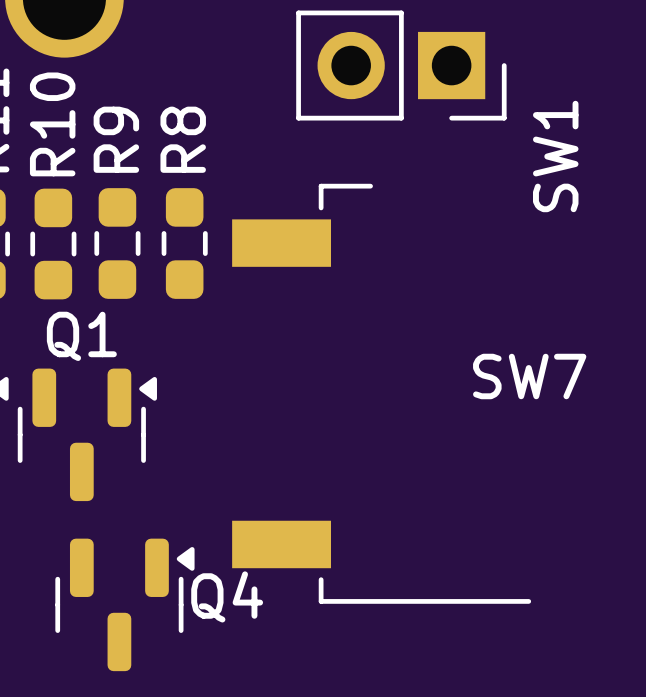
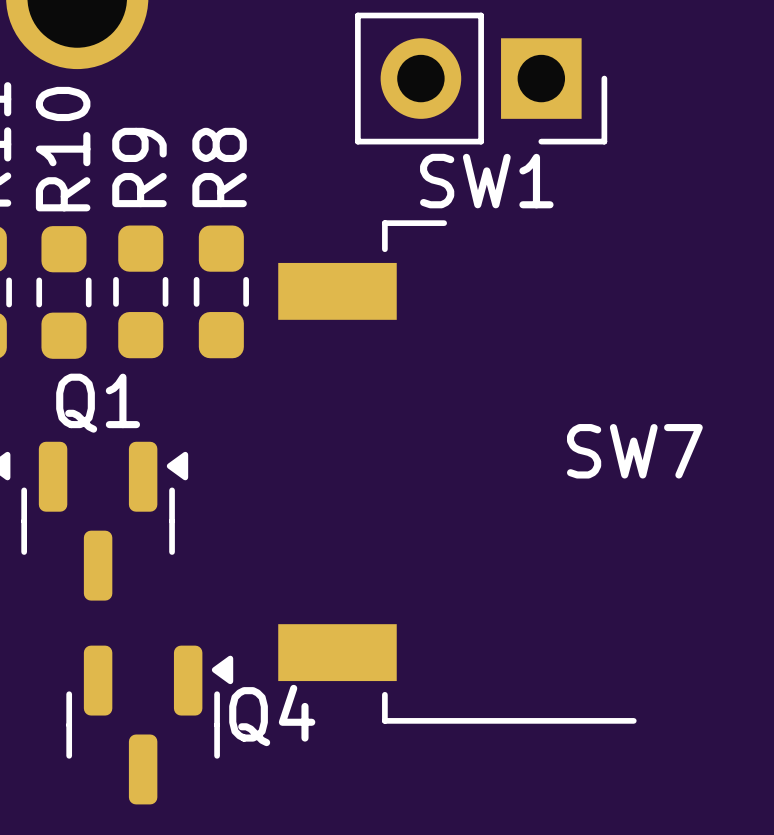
SW1 name rotation: 0° (555, 156) -> 90° clockwise (486, 181)
SW1 name position: SW1 (555, 156) -> SW1 (486, 181)

